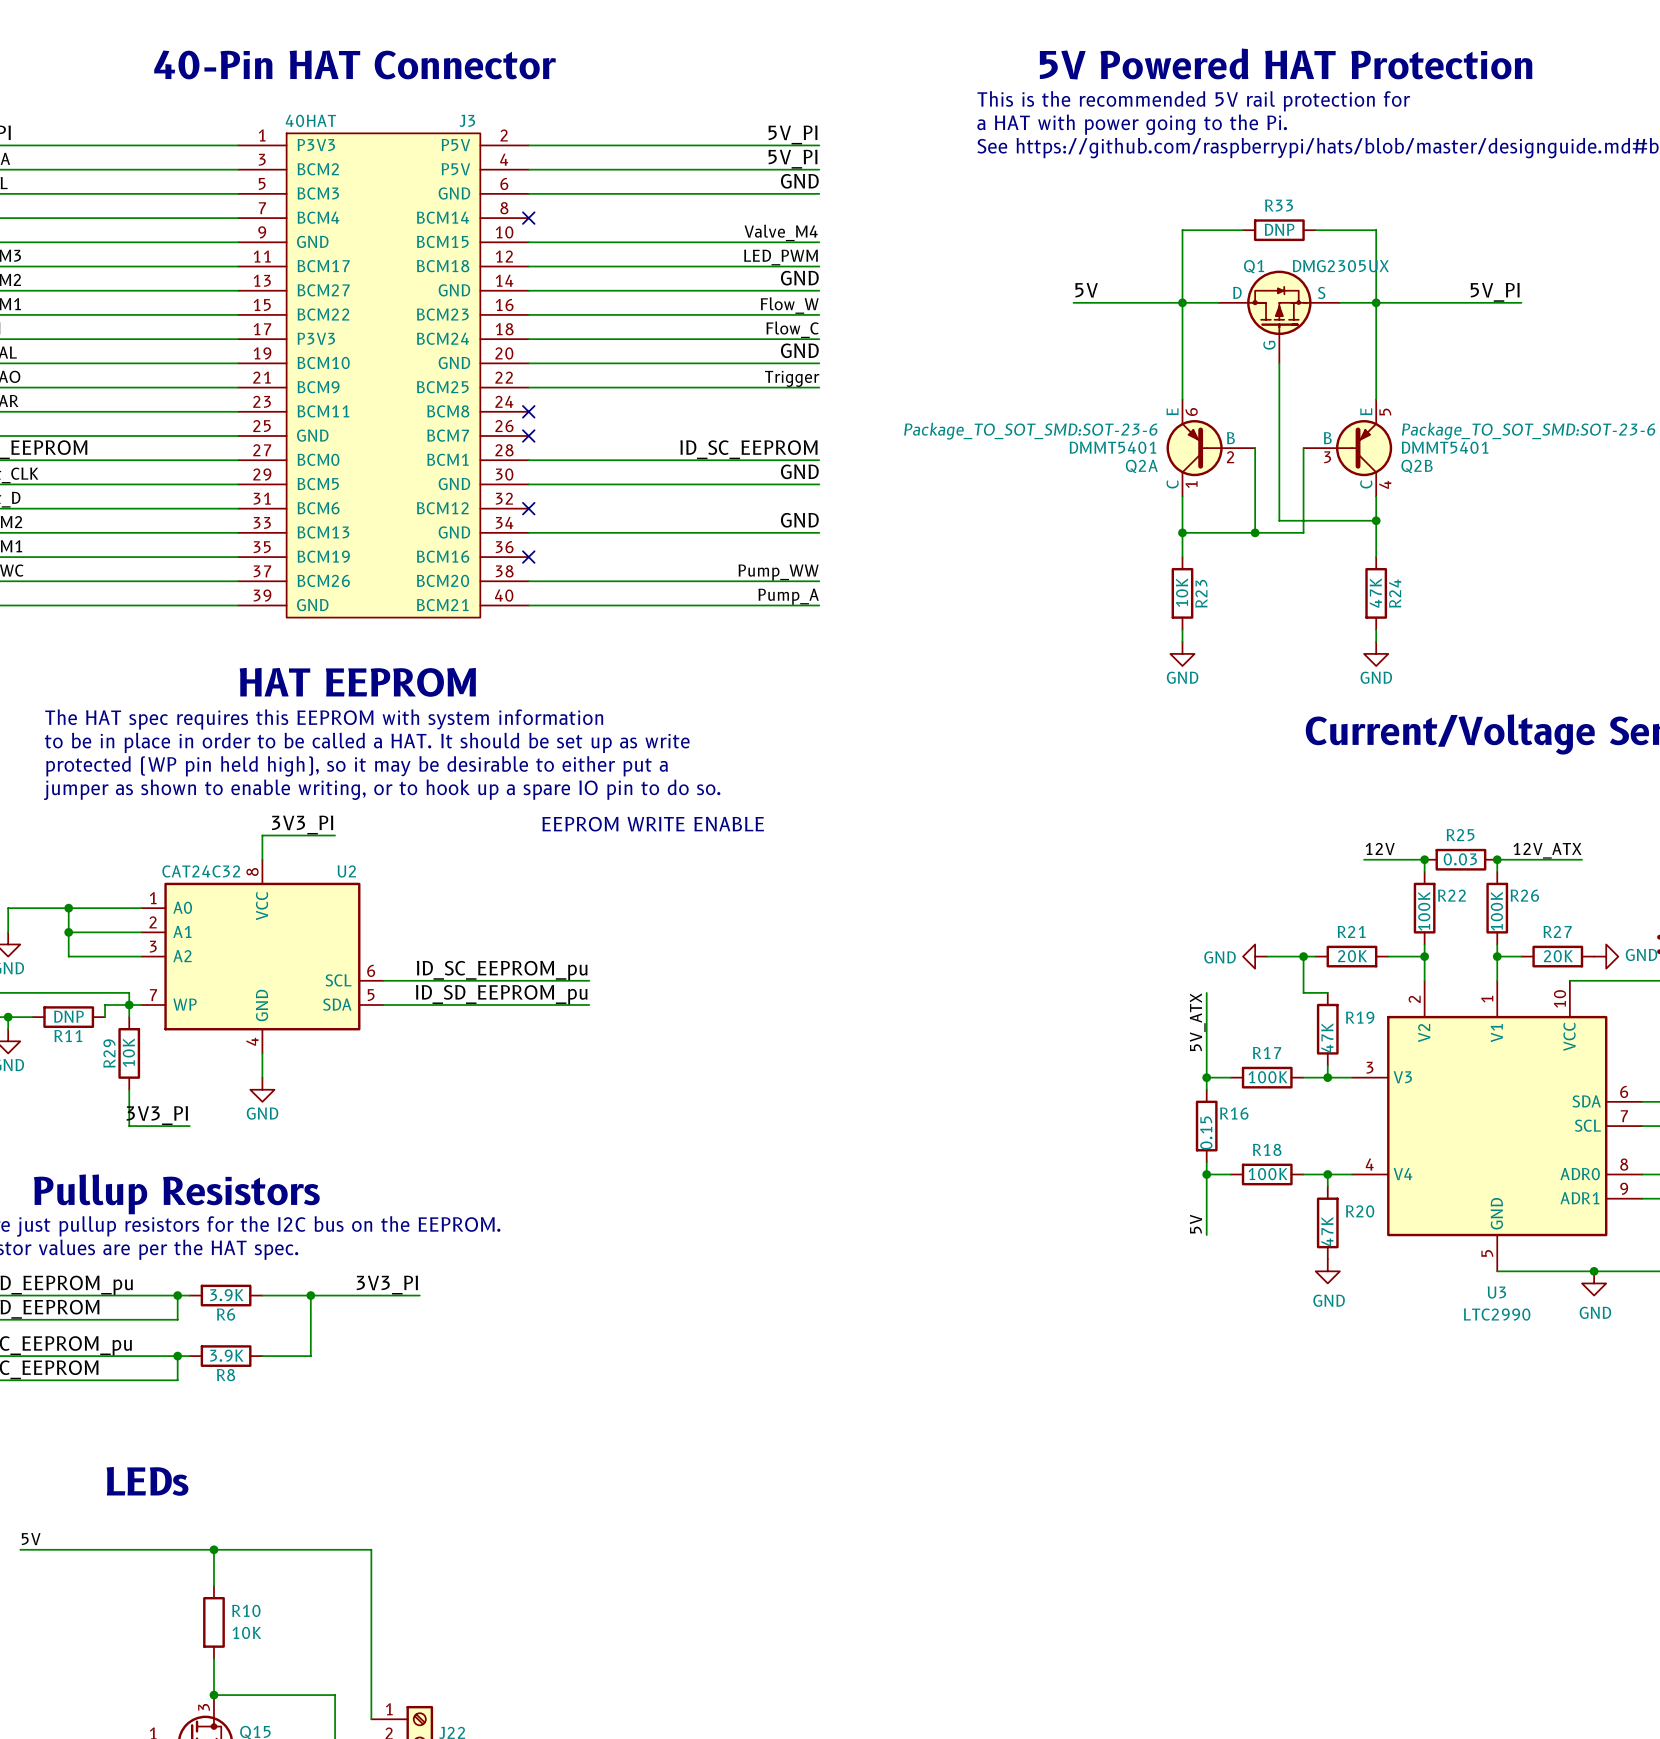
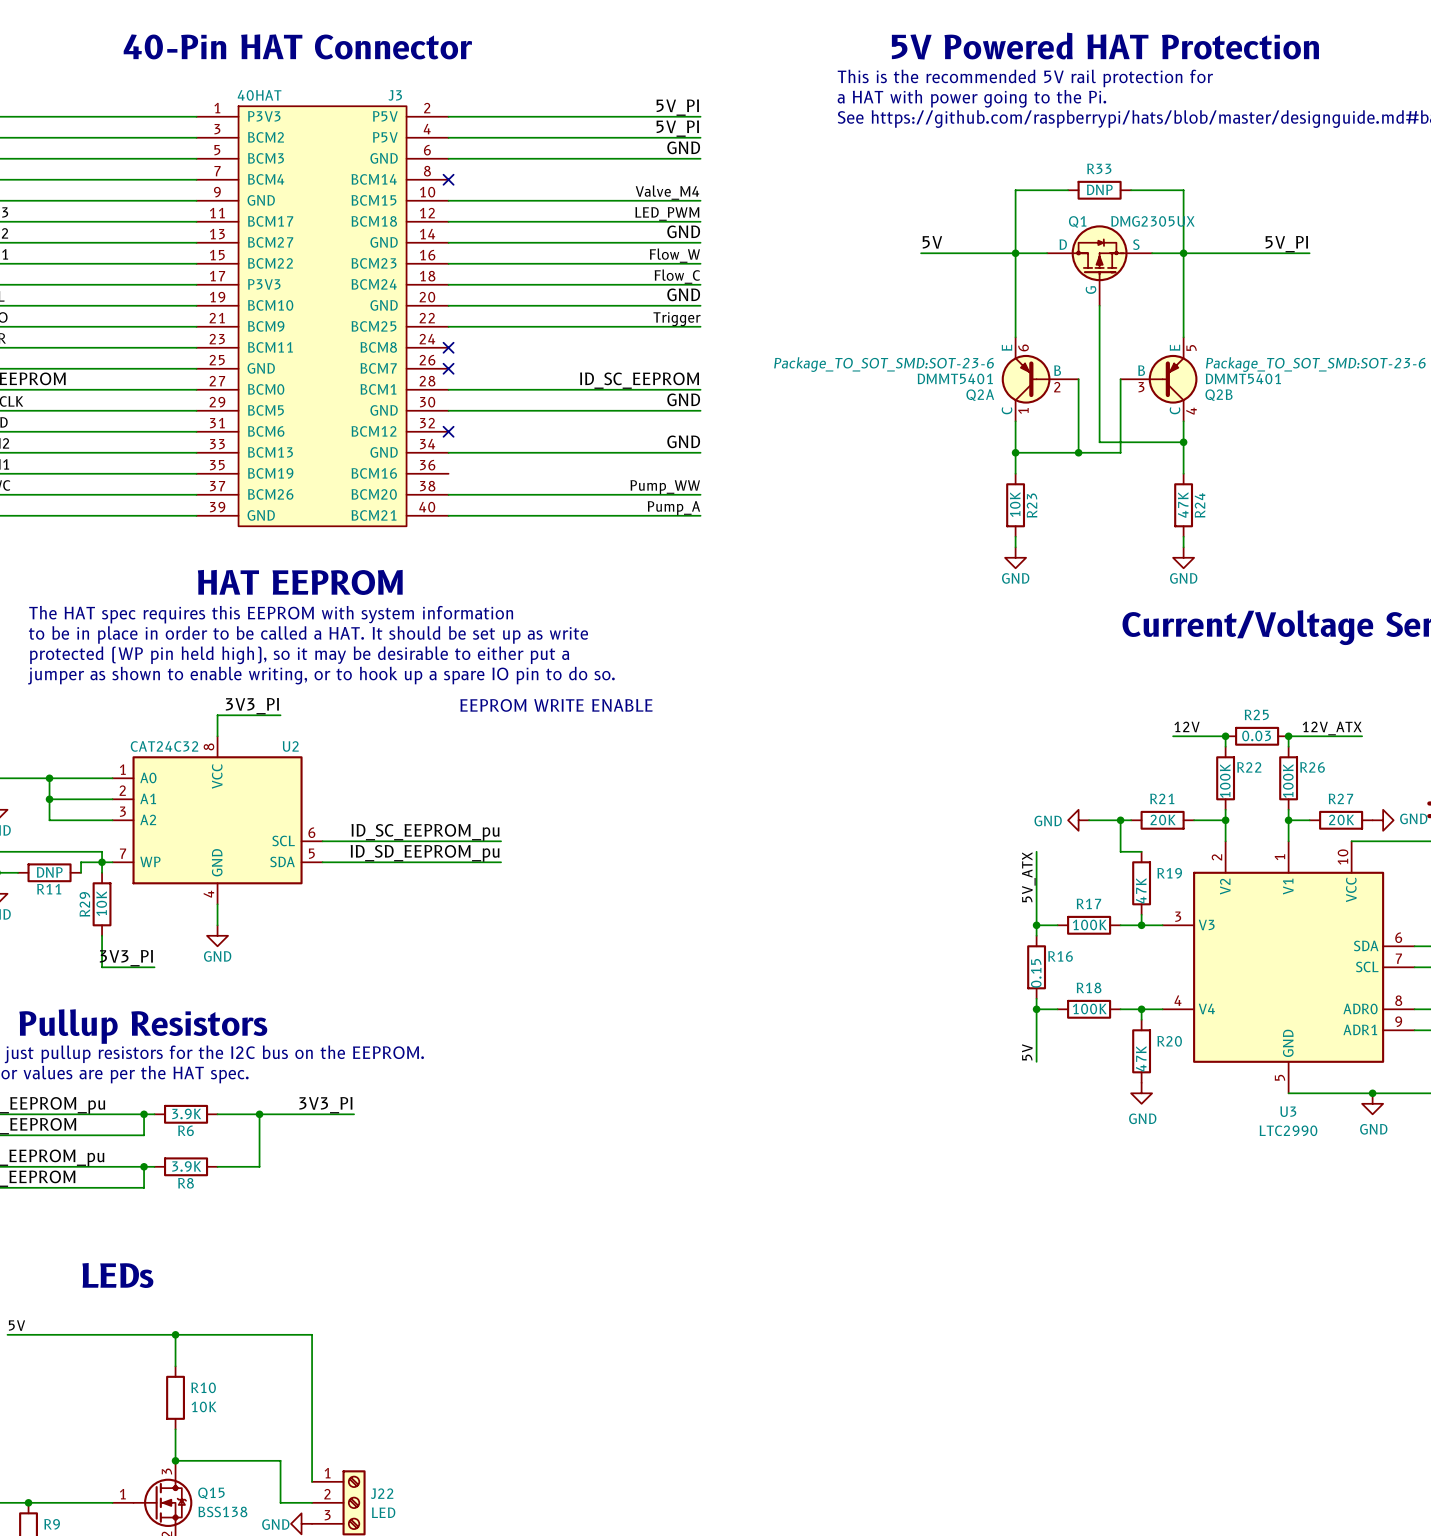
no-connect mark: (528, 557) -> none

